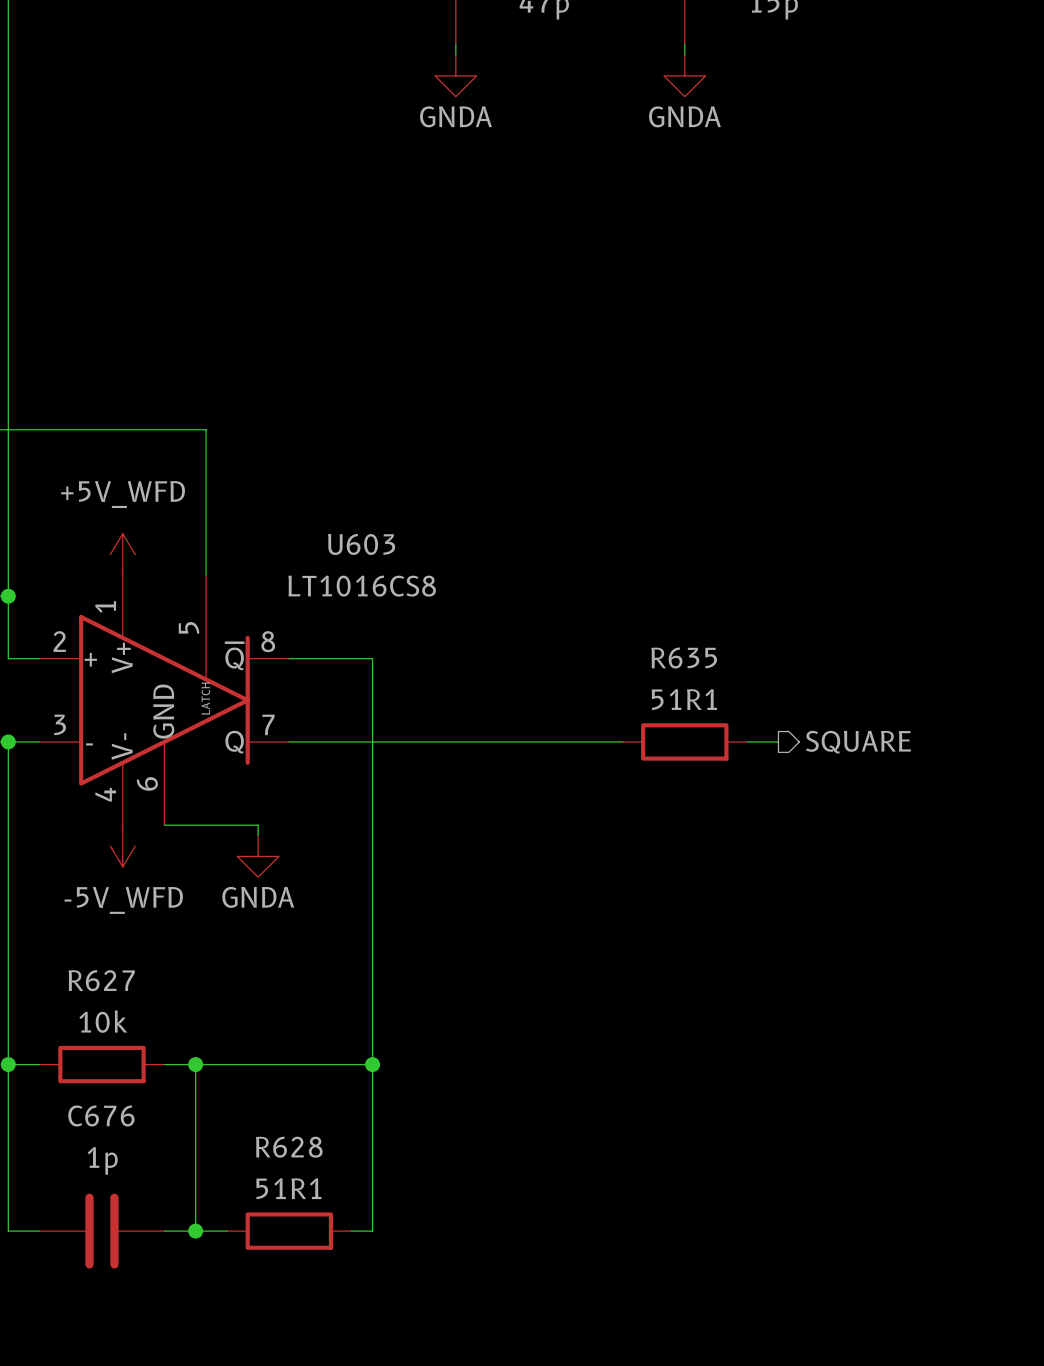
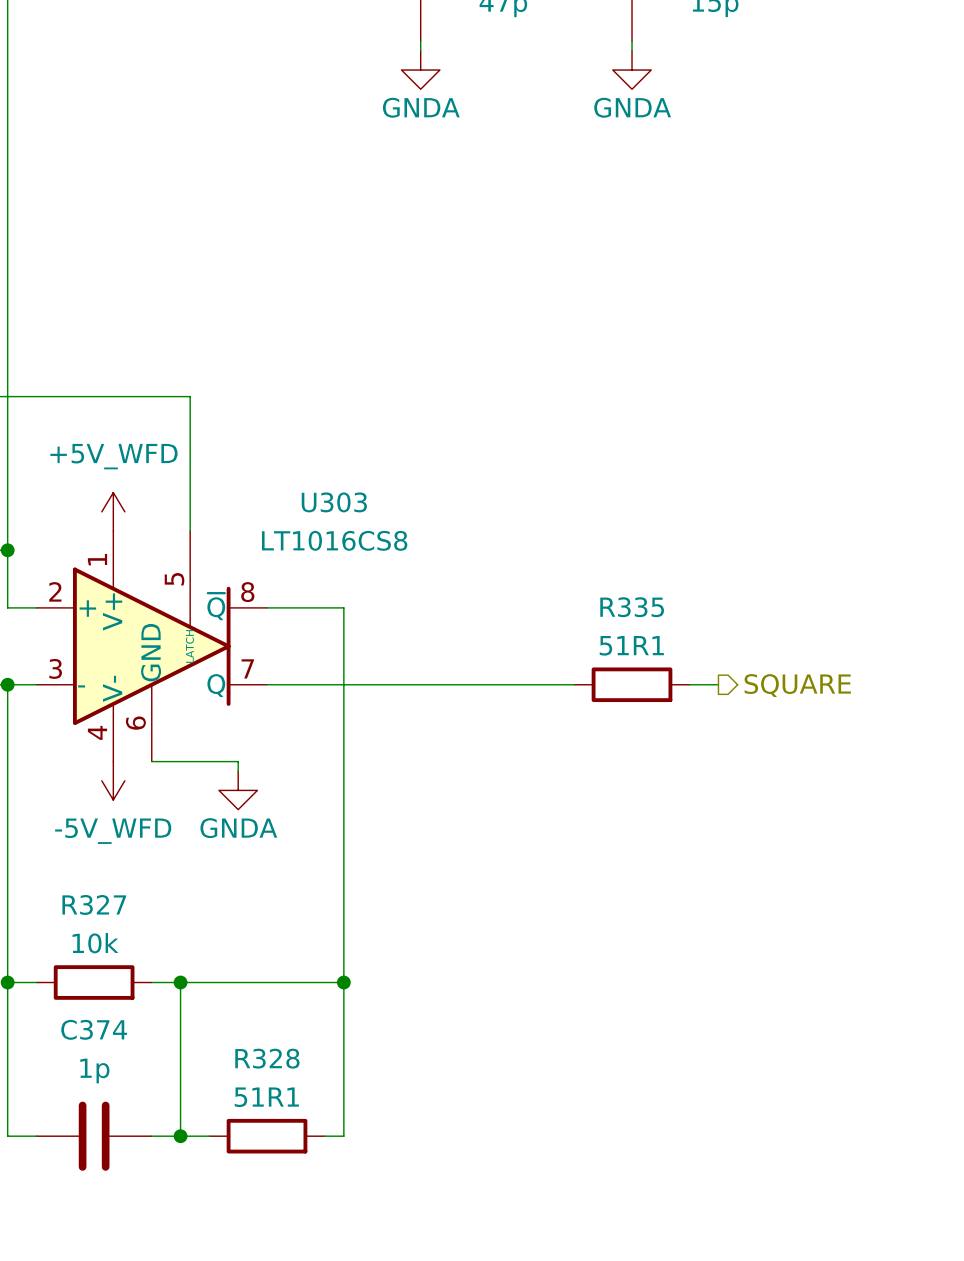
U603 name: U603 (361, 544) -> U303 (334, 502)
R635 name: R635 (684, 658) -> R335 (632, 607)
R627 name: R627 (101, 980) -> R327 (94, 904)
C676 name: C676 (101, 1115) -> C374 (94, 1029)
R628 name: R628 (289, 1147) -> R328 (267, 1058)

